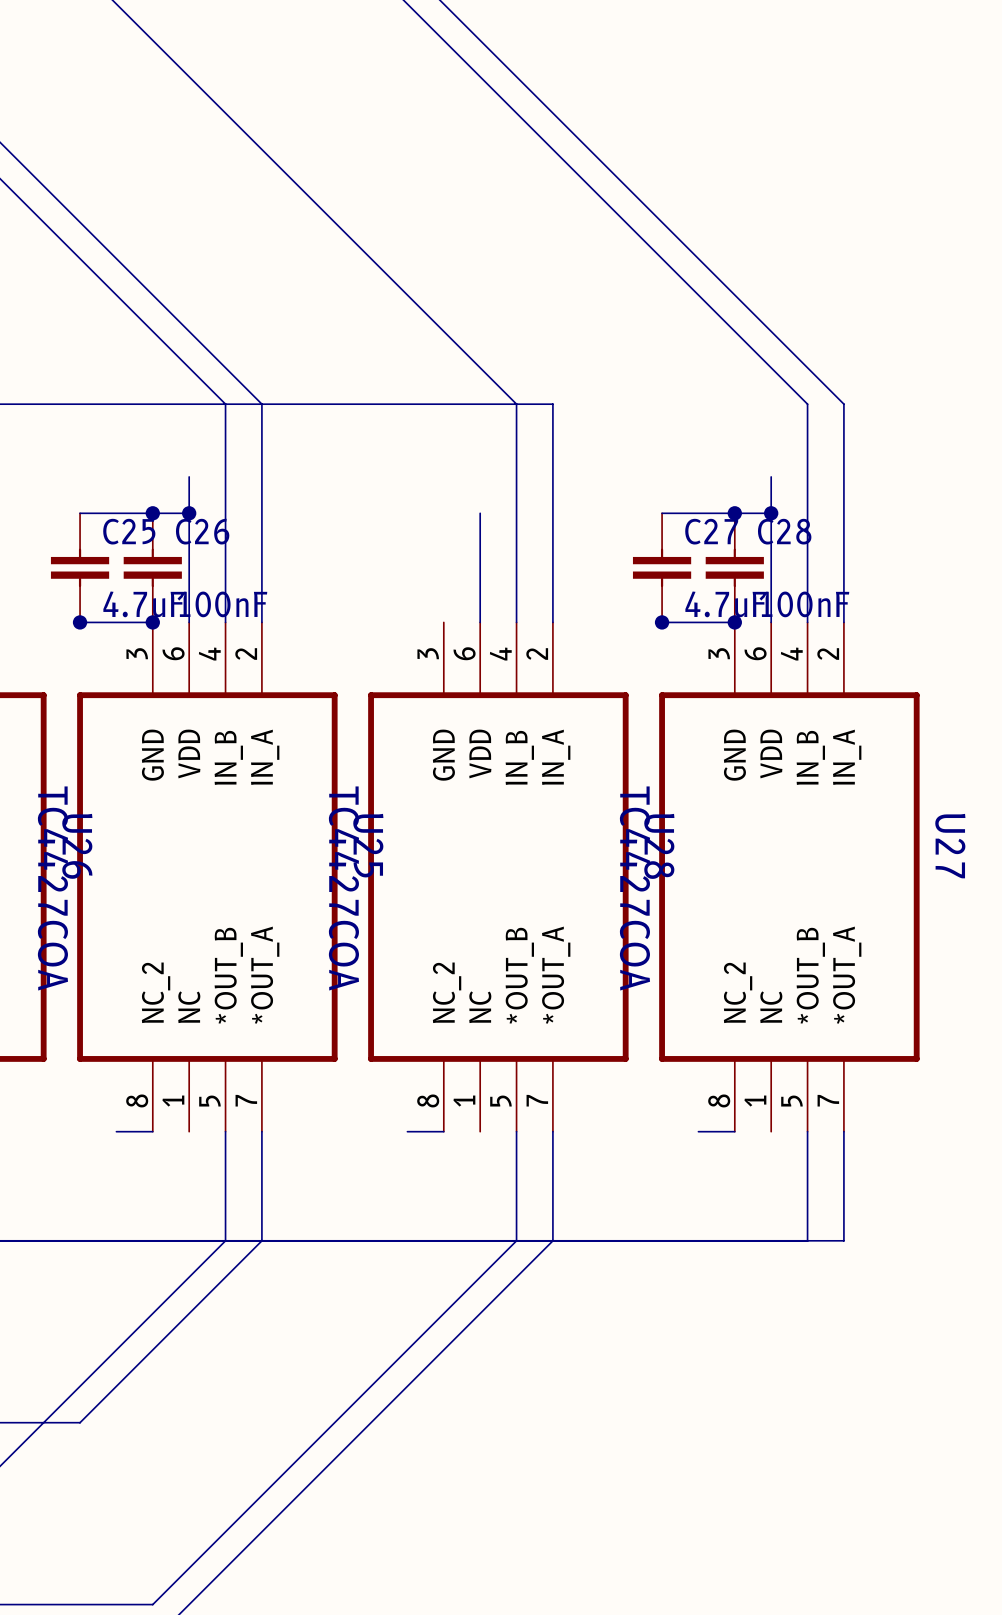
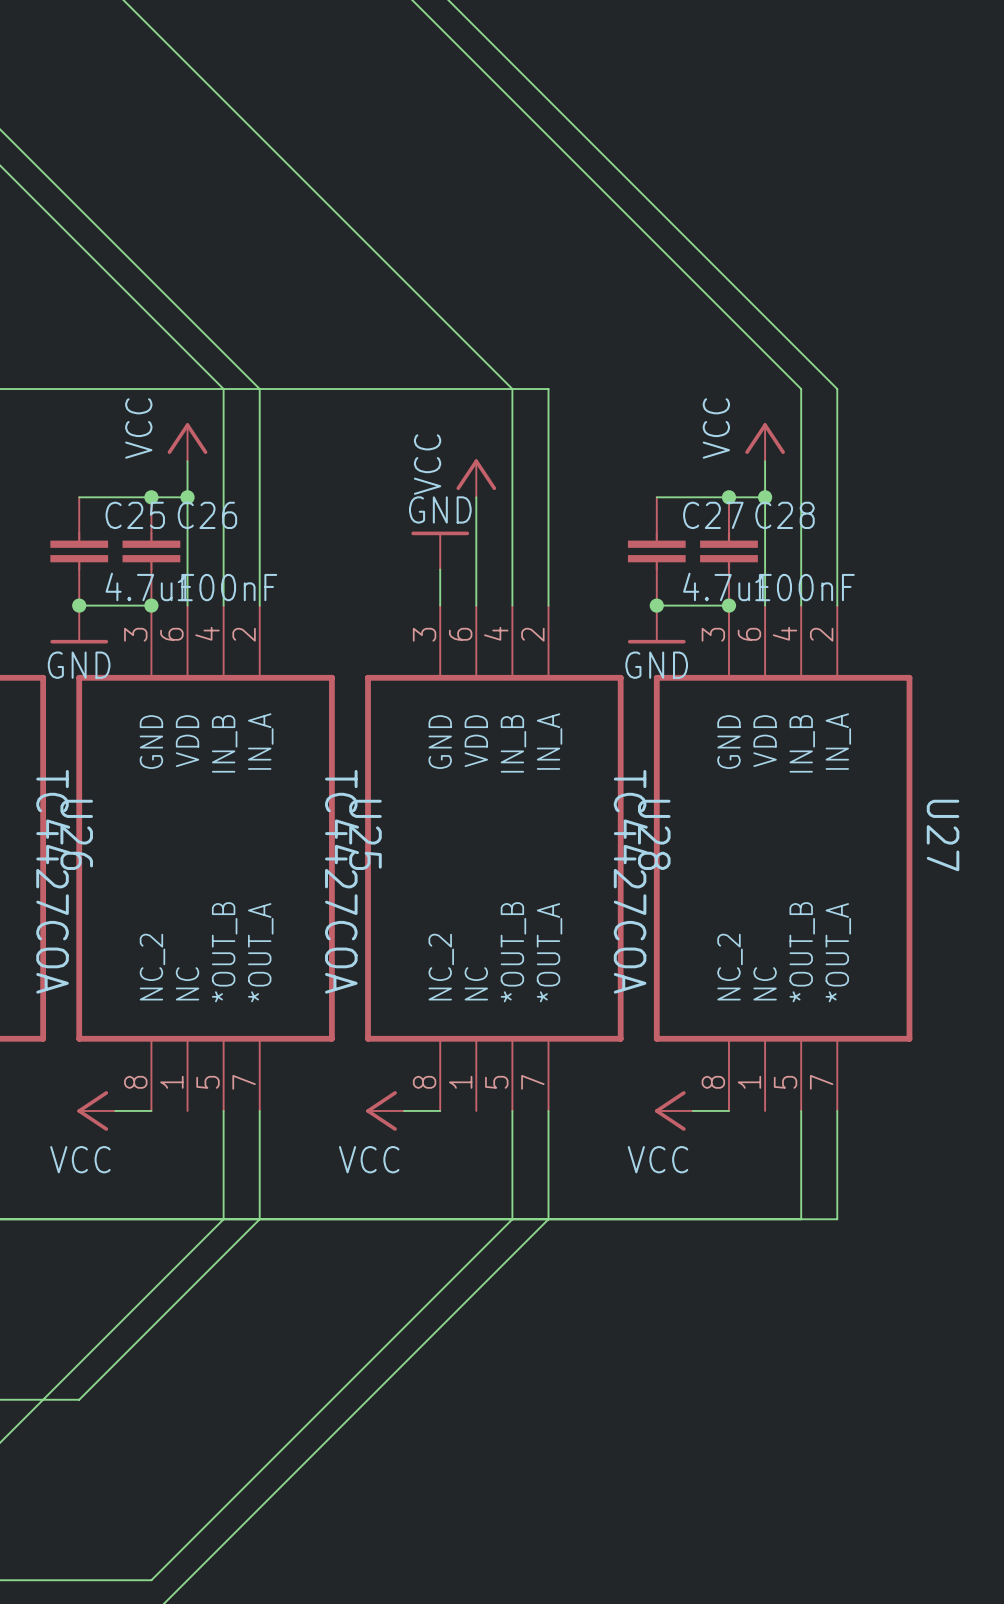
power symbol: none -> VCC (187, 442)
power symbol: none -> VCC (765, 442)
power symbol: none -> VCC (476, 478)
power symbol: none -> GND (440, 550)
wire: none -> (440, 569) (440, 605)
power symbol: none -> GND (79, 624)
power symbol: none -> GND (656, 624)
power symbol: none -> VCC (96, 1110)
power symbol: none -> VCC (385, 1110)
power symbol: none -> VCC (673, 1110)

